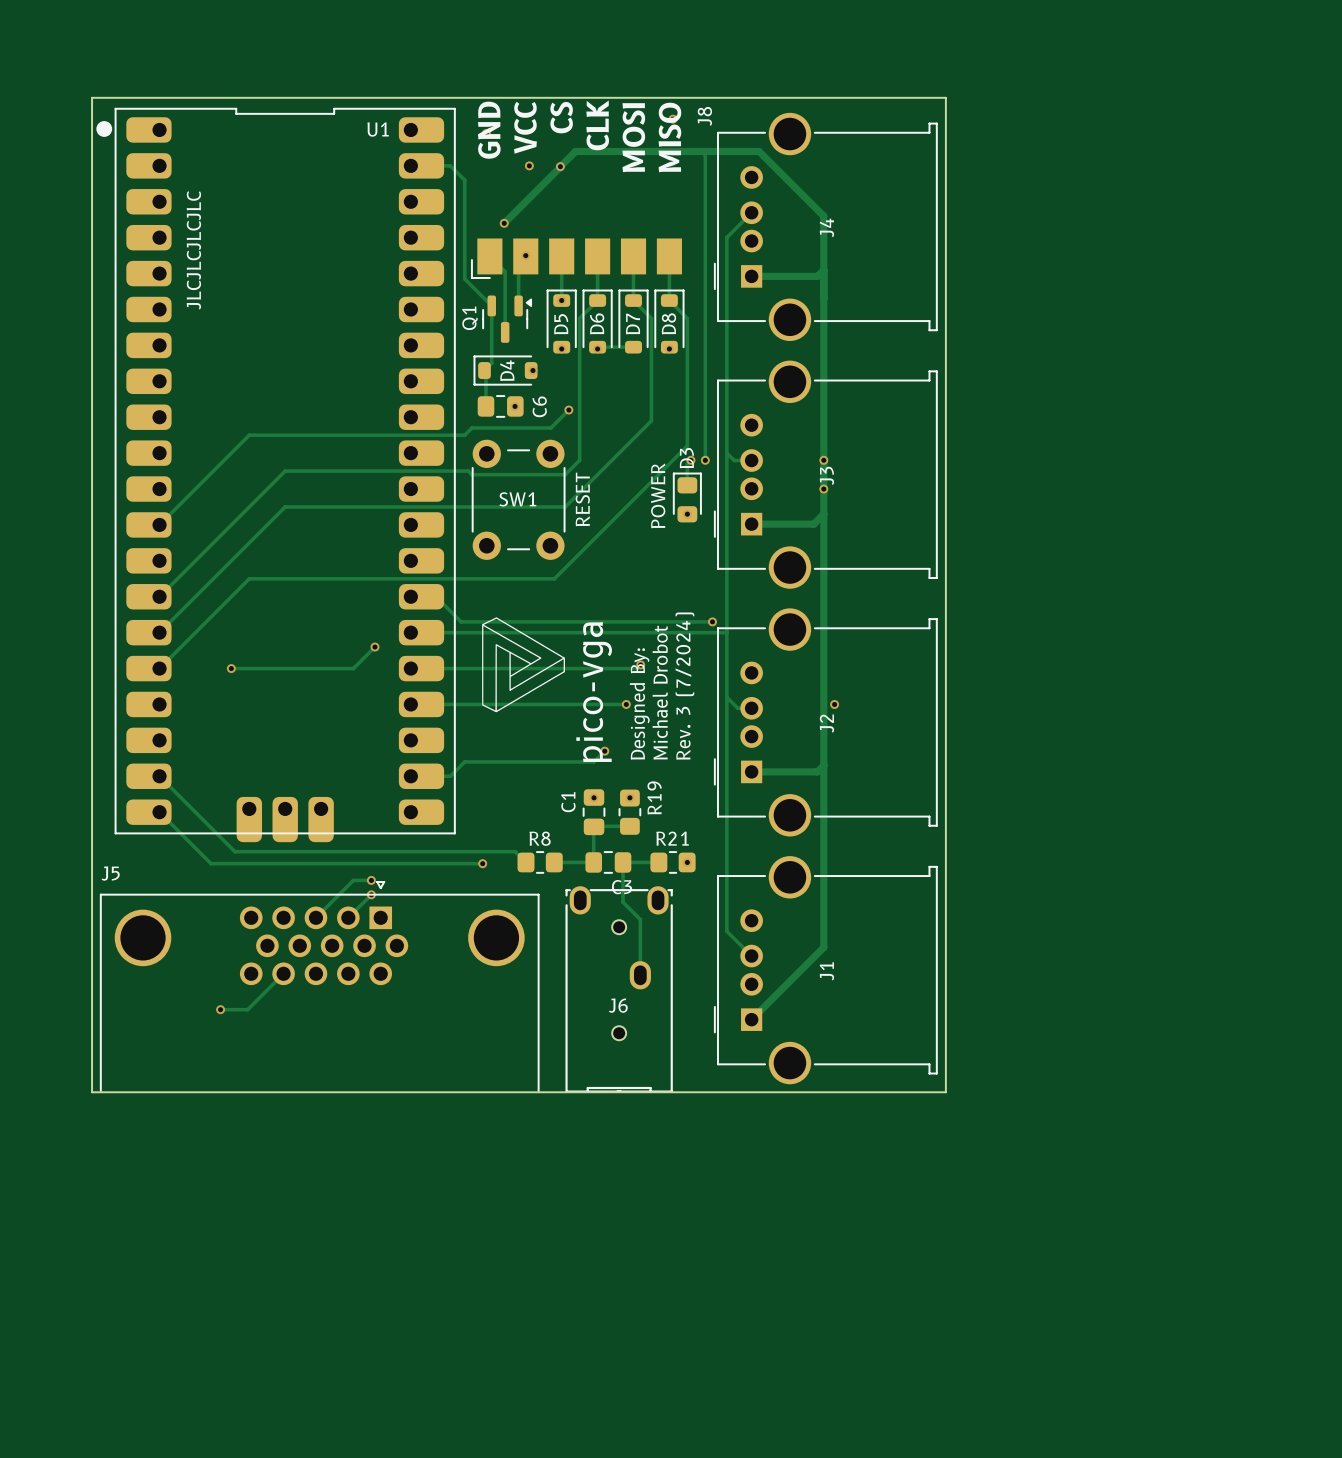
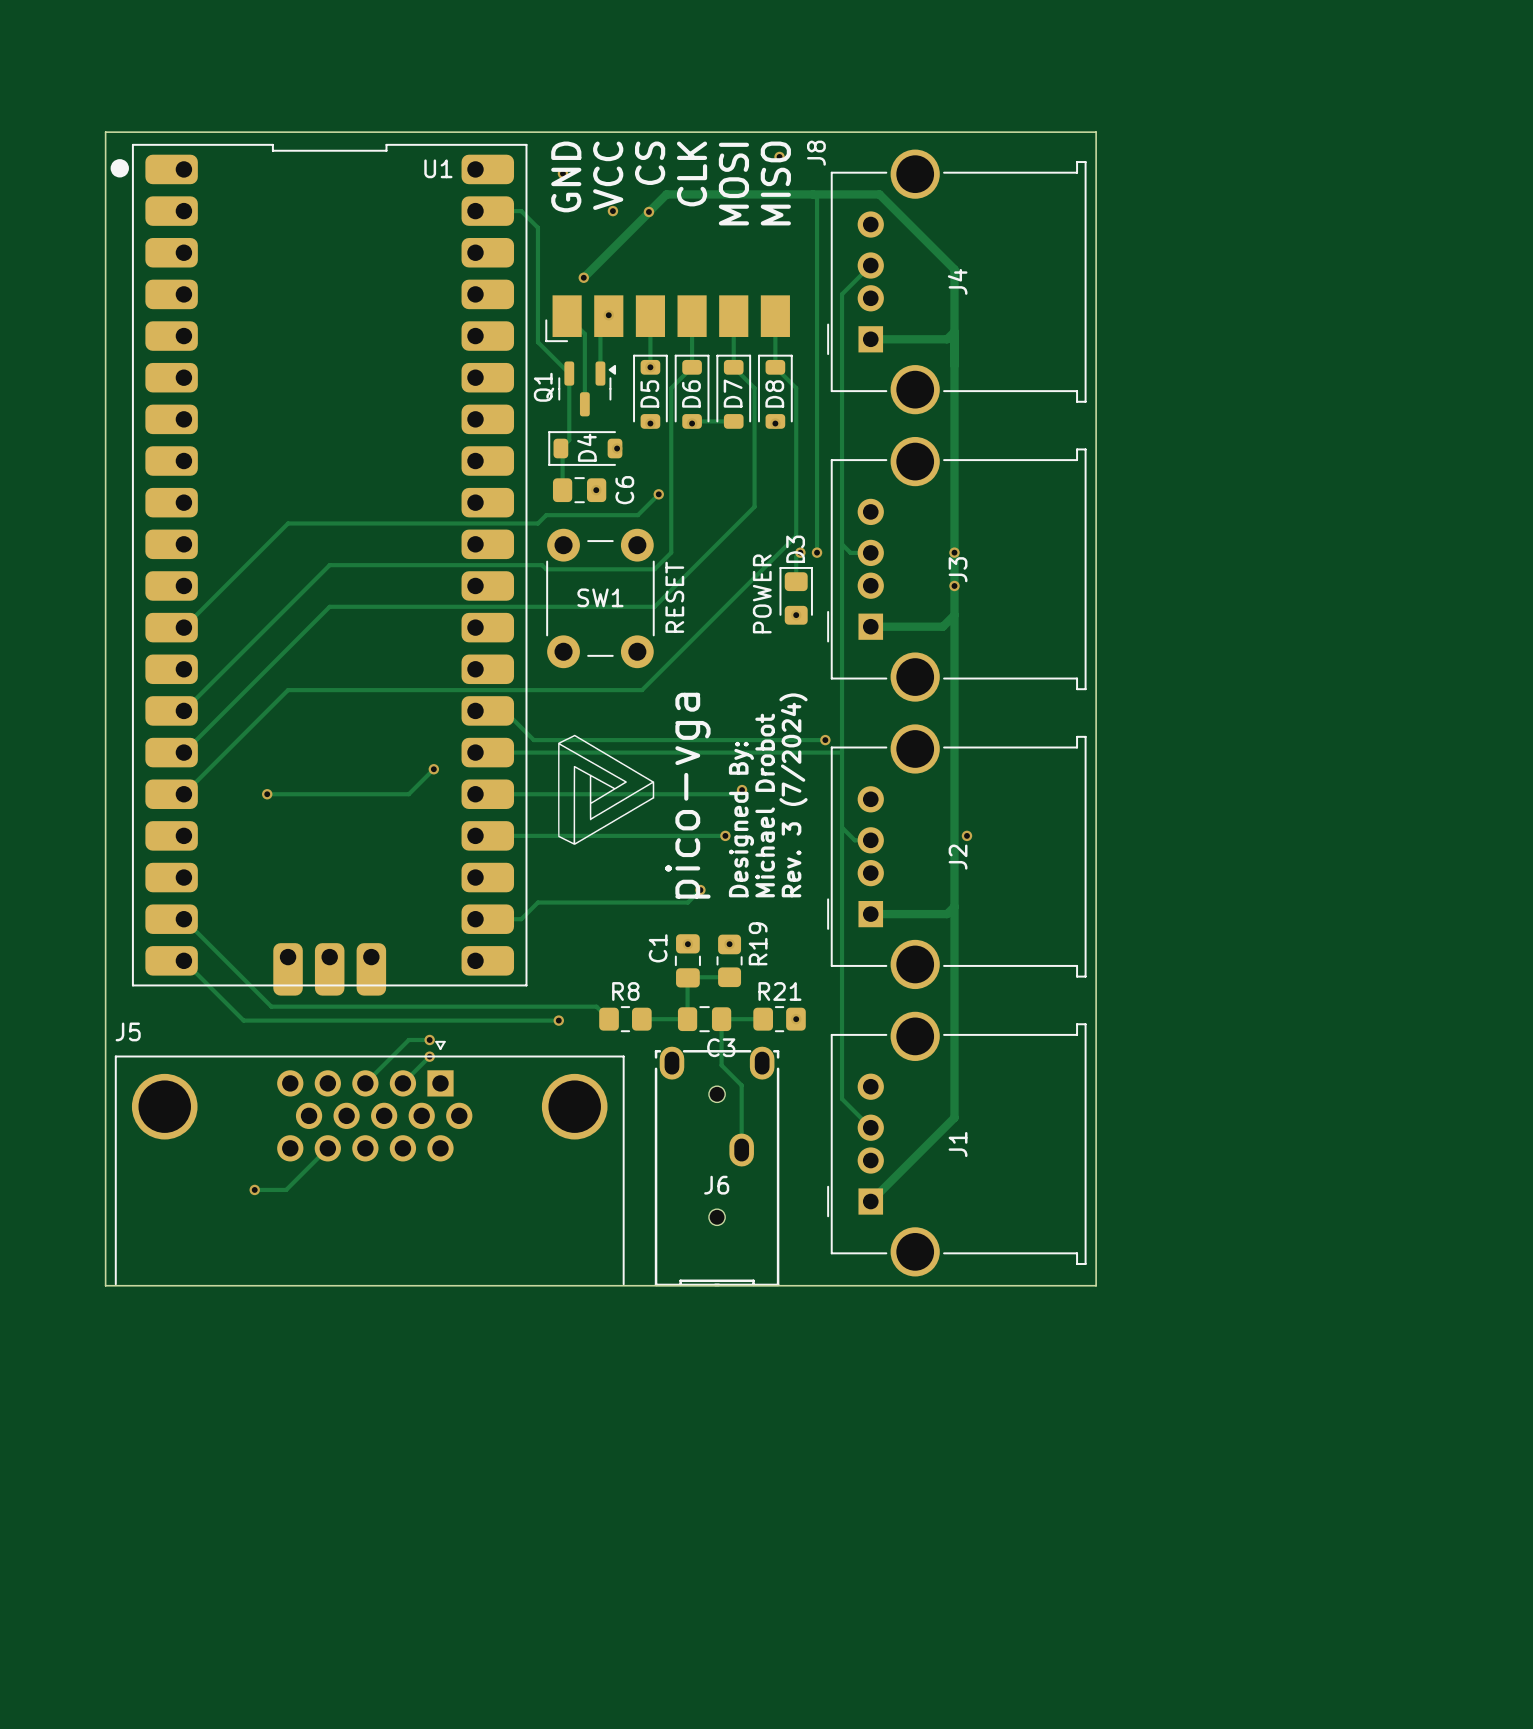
text: JLCJLCJLCJLC (193, 250) -> none

